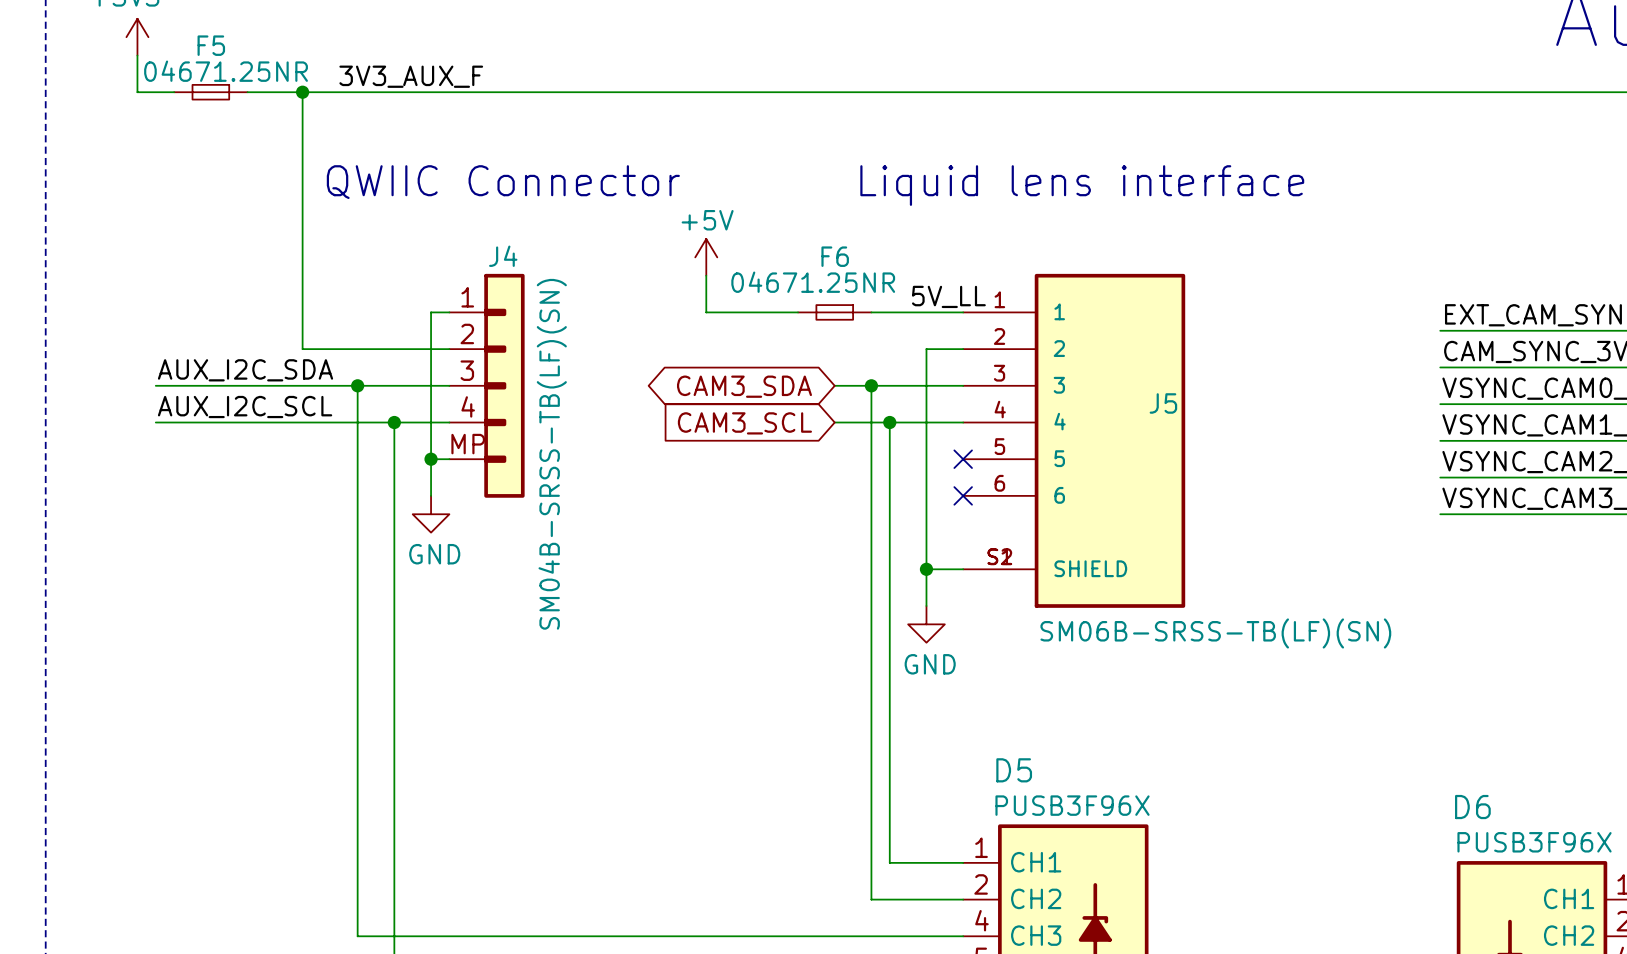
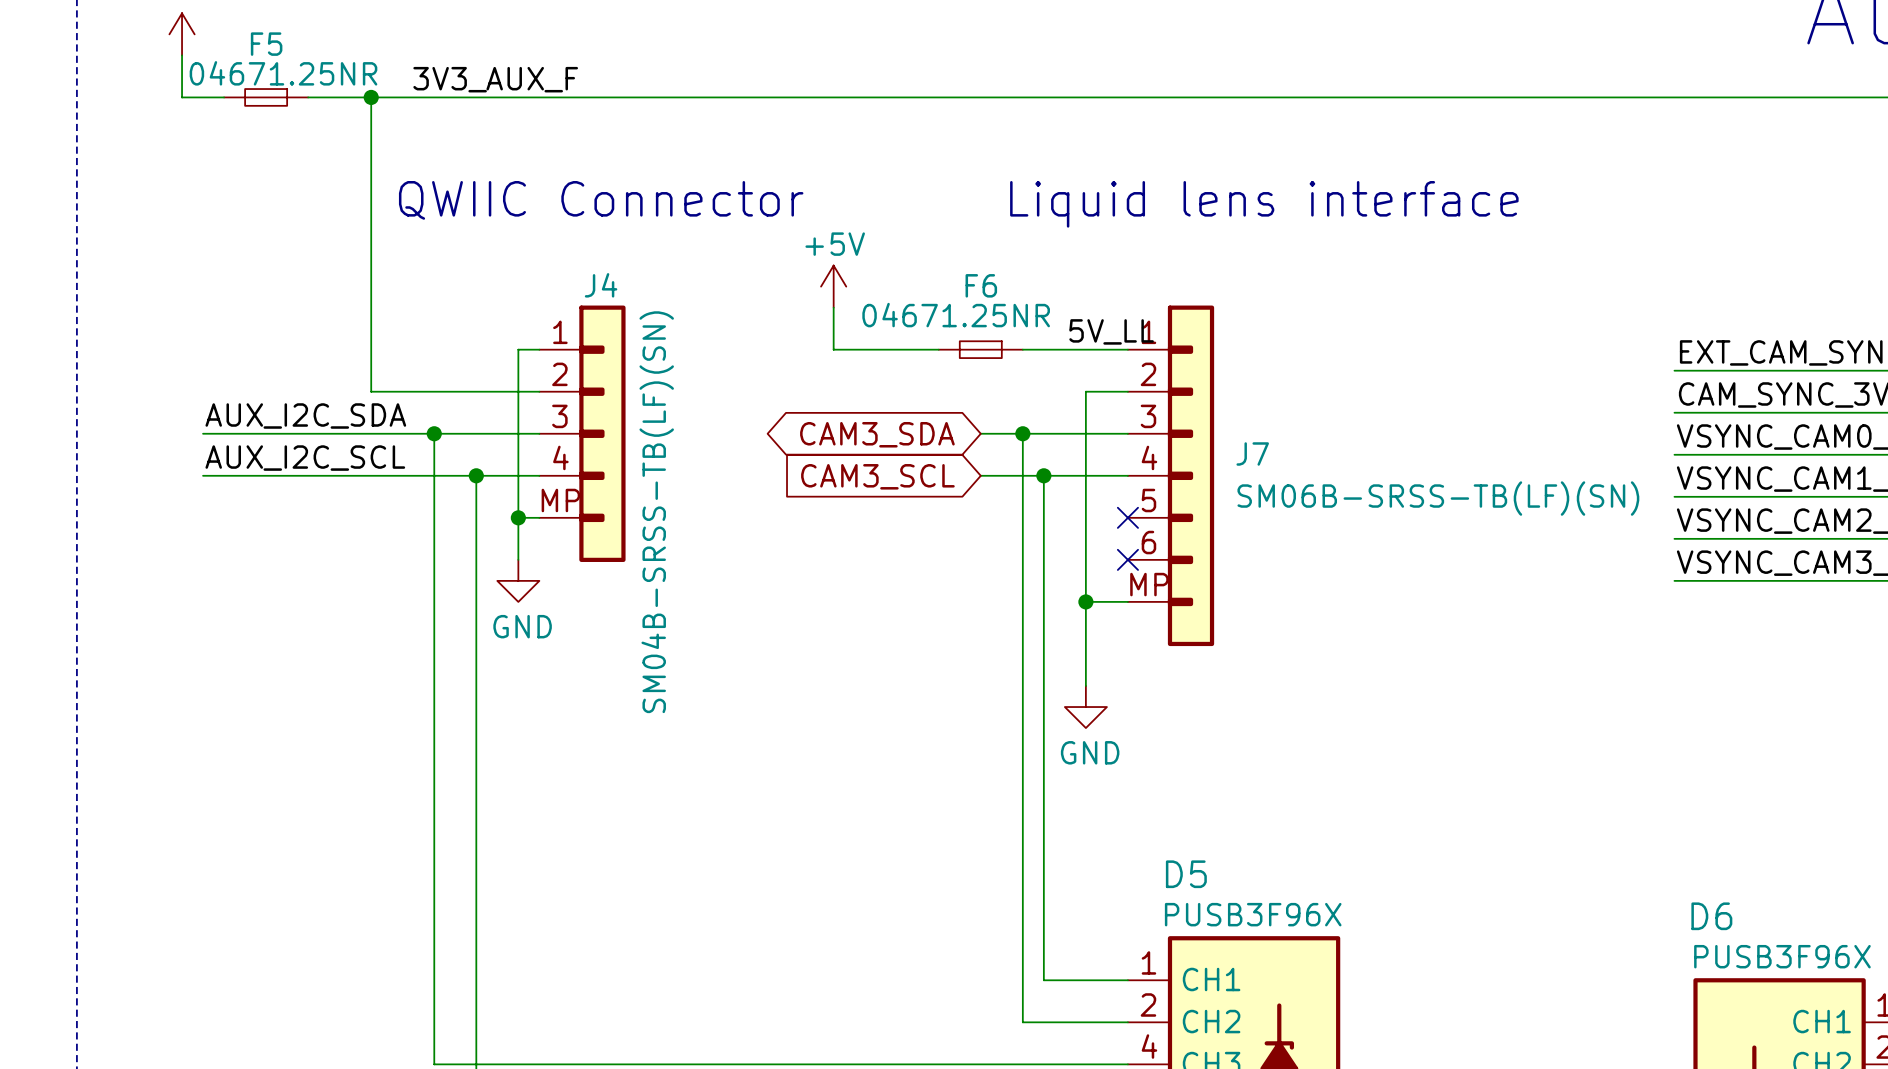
J7: none -> (1171, 475)
J5: SM06B-SRSS-TB(LF)(SN) (1074, 440) -> none
wire: (926, 569) (963, 569) -> (1085, 601) (1127, 601)
junction position: (926, 569) -> (1085, 601)

